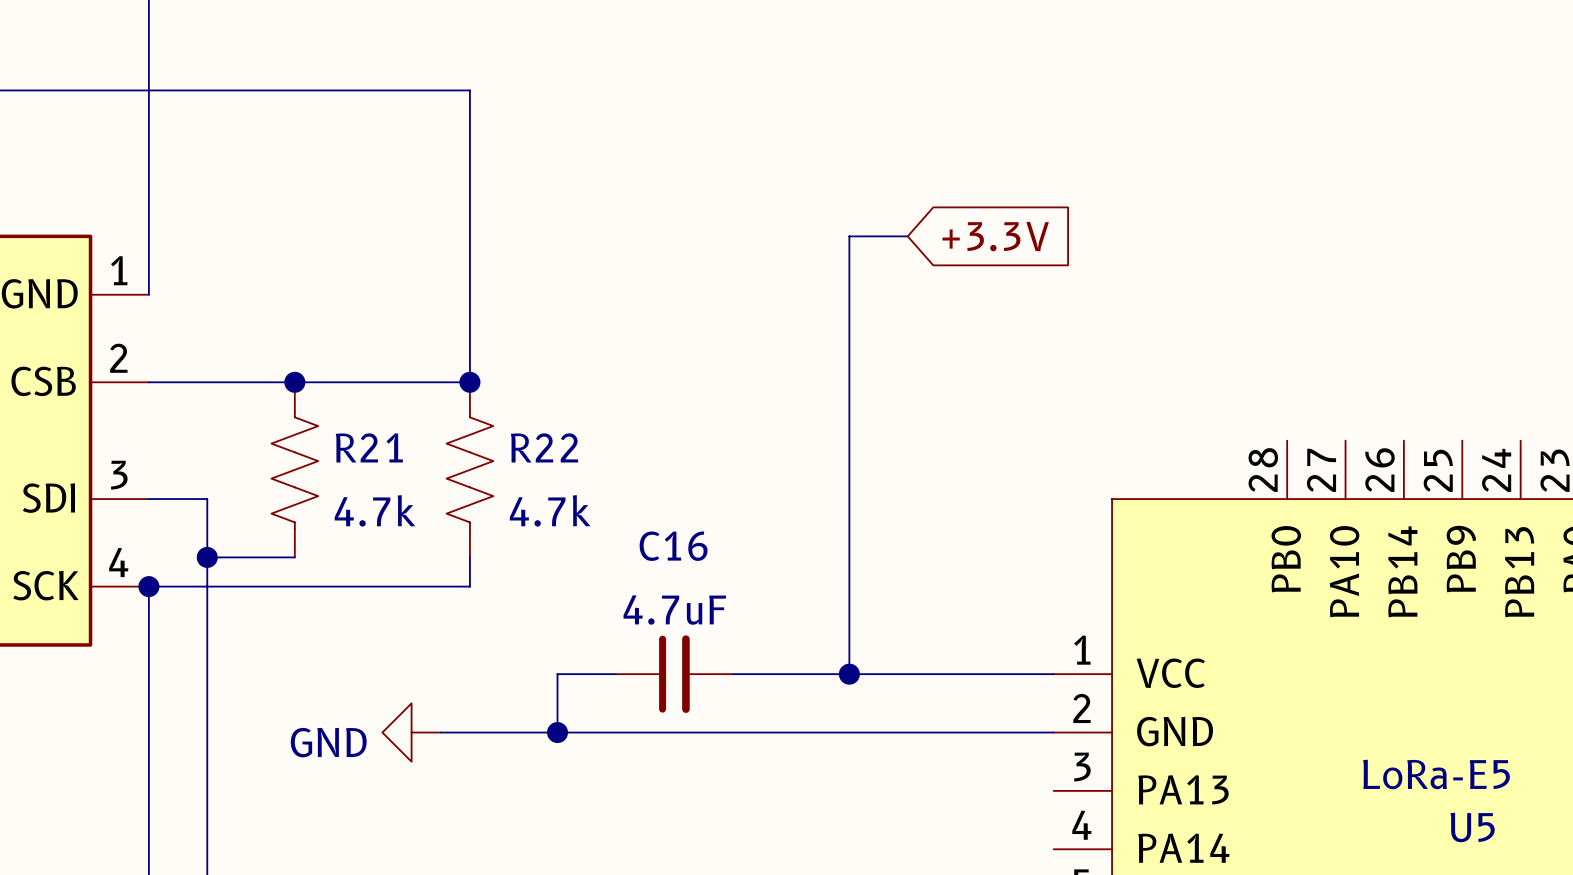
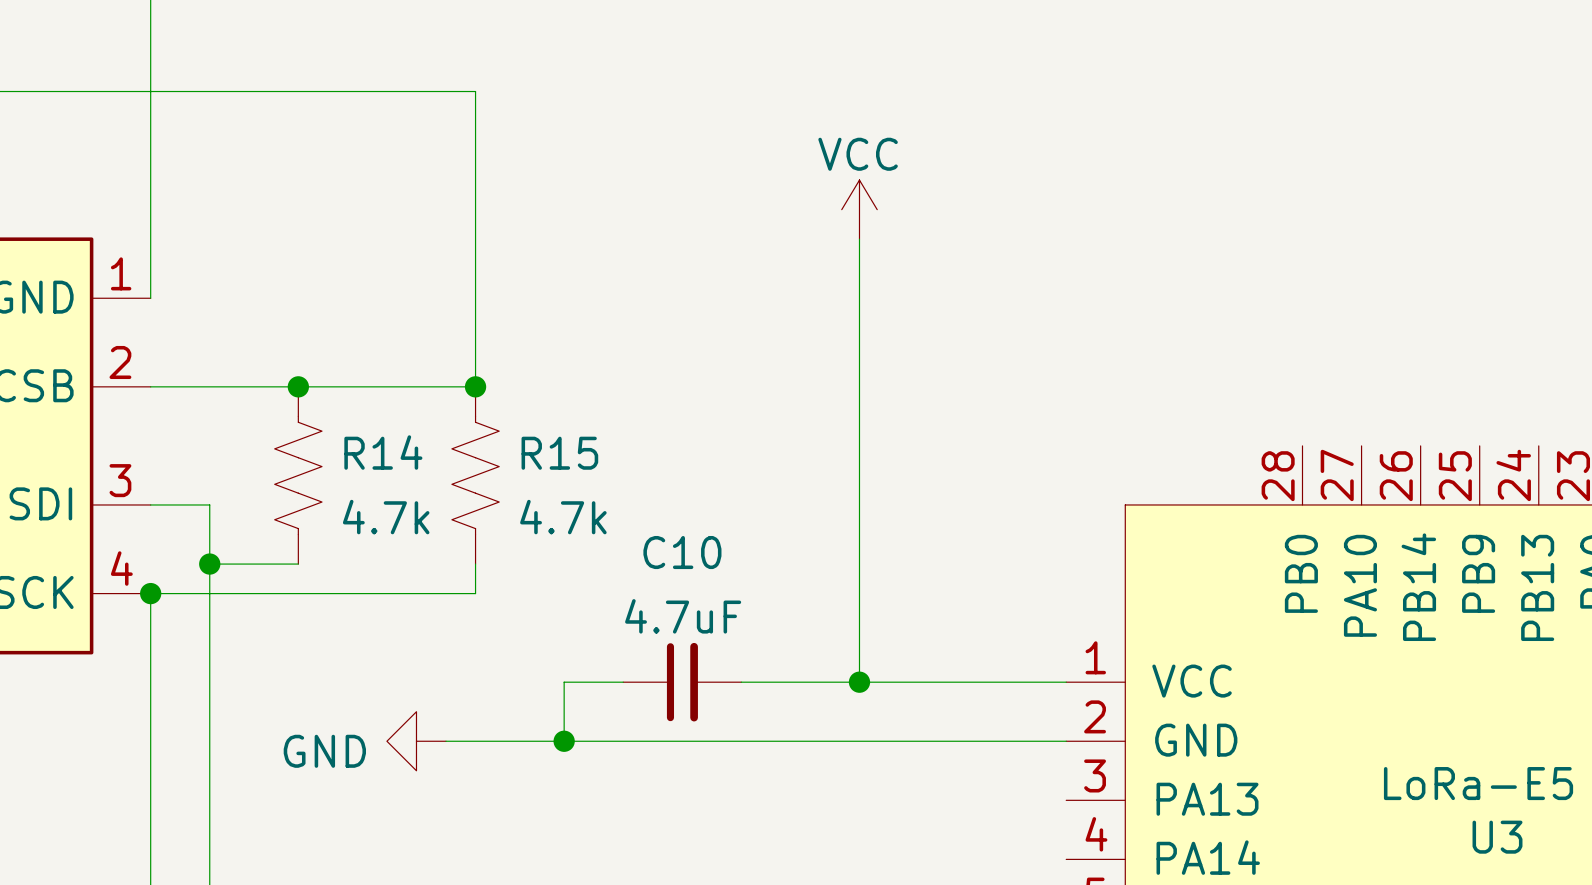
power symbol: none -> VCC (859, 209)
wire: (849, 236) (907, 236) -> none
global label: +3.3V (995, 236) -> none
R21 name: R21 (369, 447) -> R14 (383, 452)
R22 name: R22 (544, 447) -> R15 (559, 453)
C16 name: C16 (673, 546) -> C10 (682, 552)
U5 name: U5 (1472, 827) -> U3 (1497, 837)

